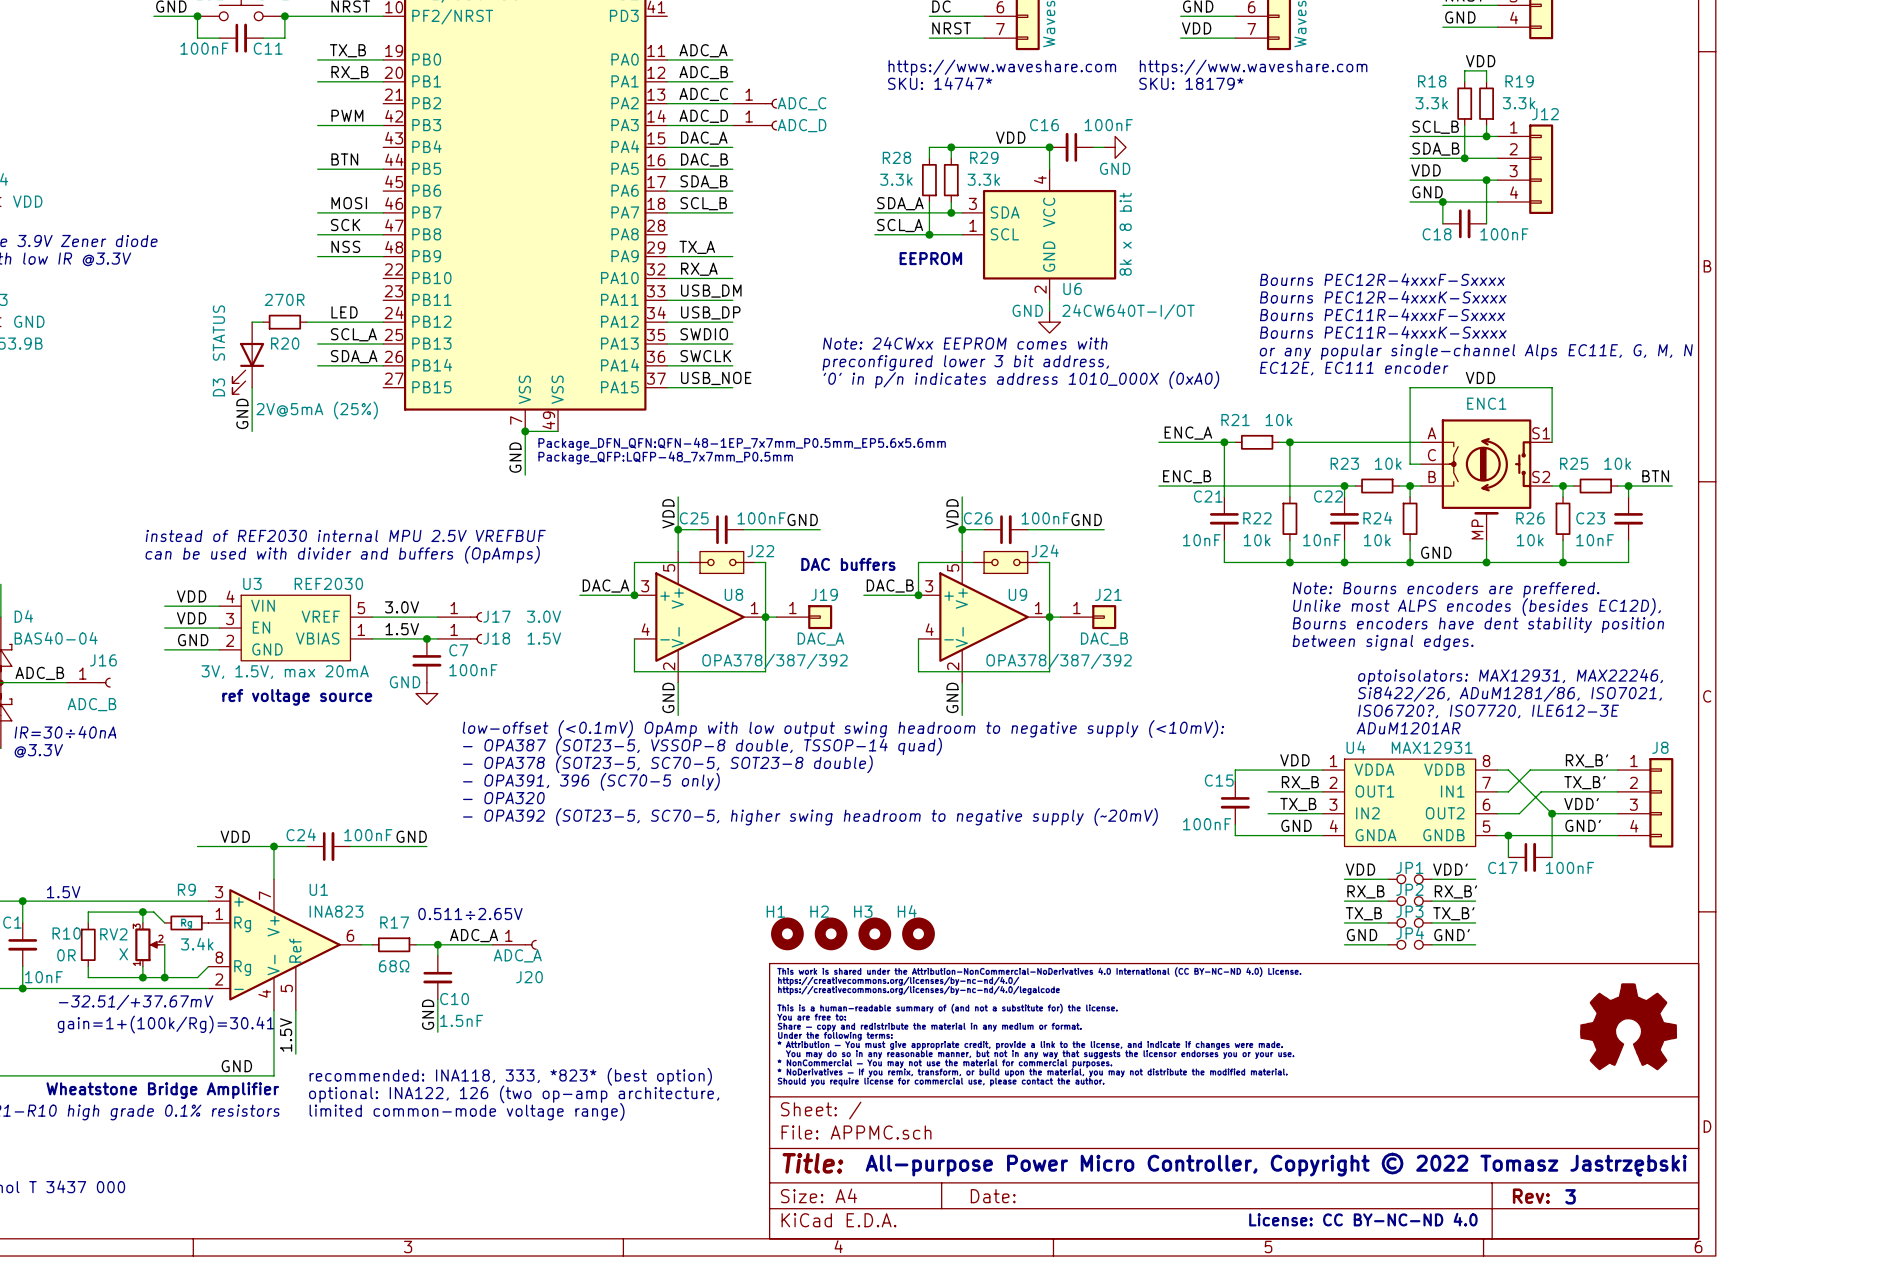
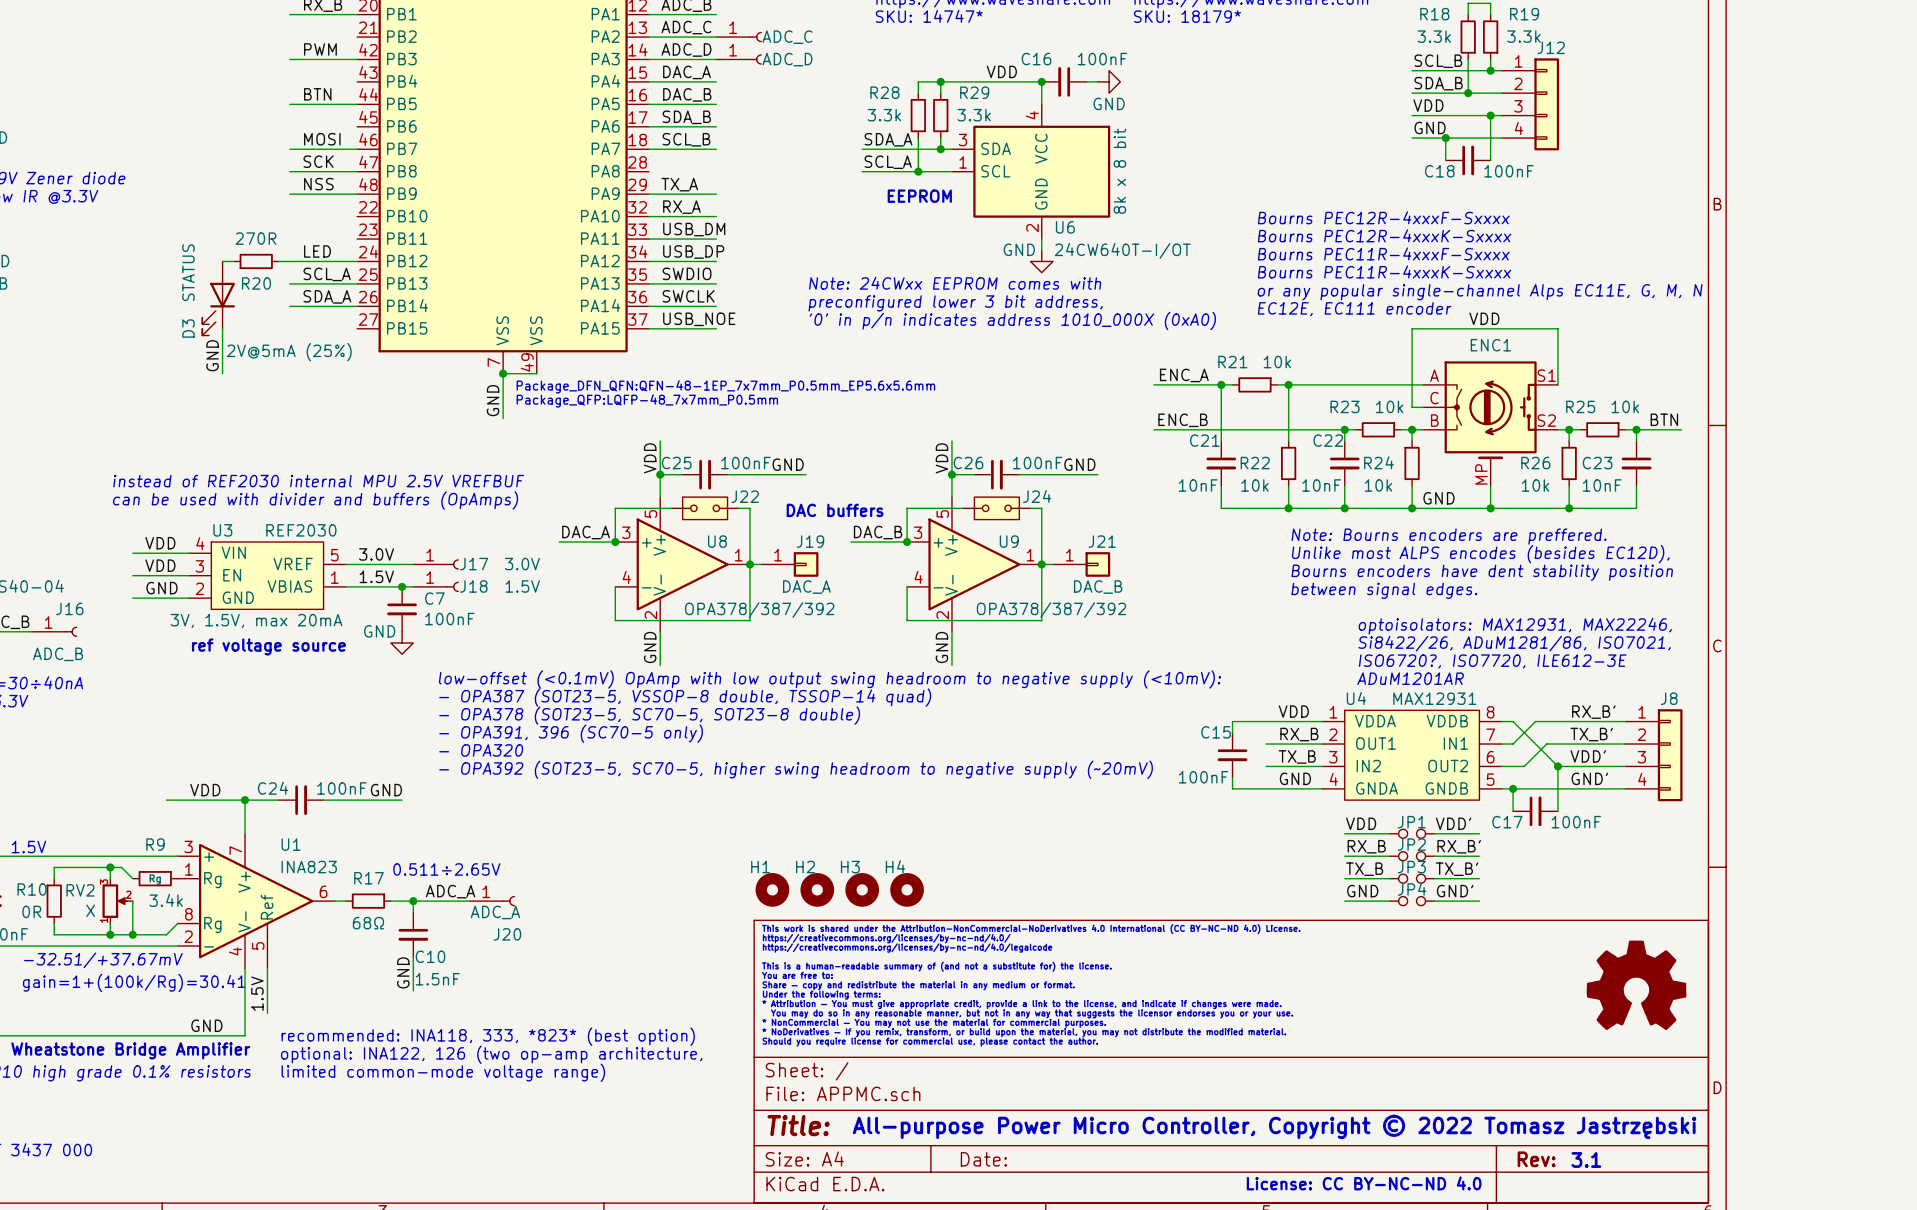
text: 3 (1570, 1196) -> 3.1 (1586, 1159)

